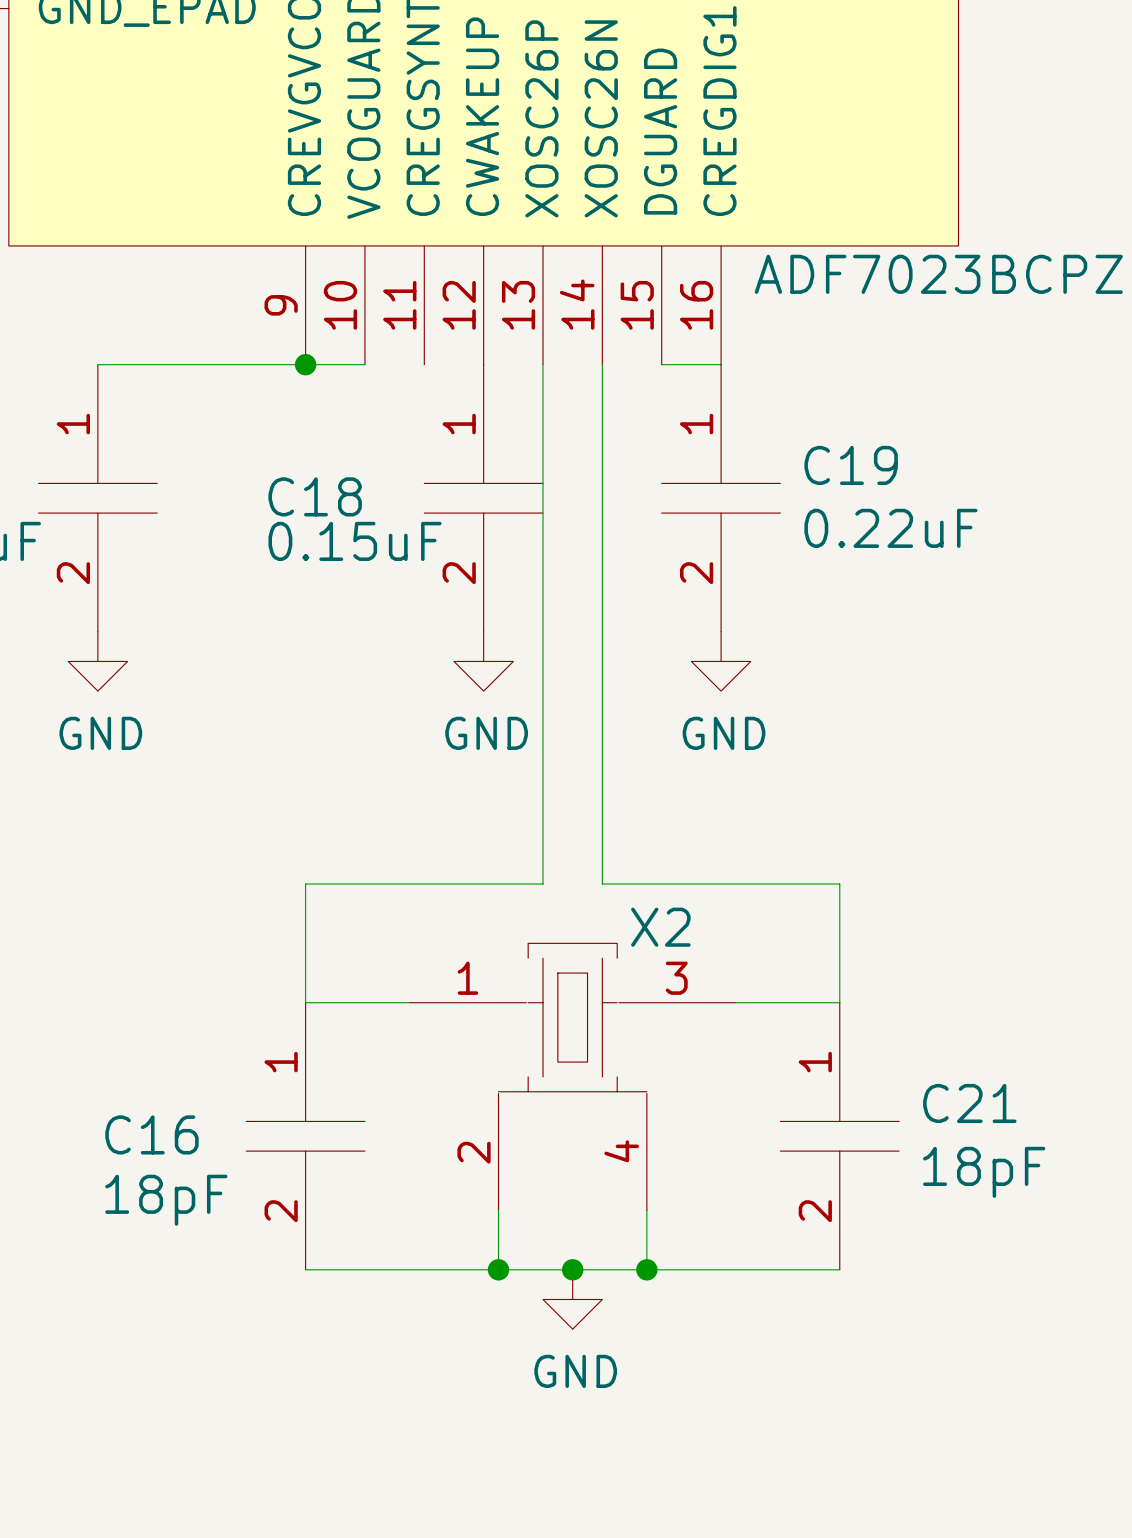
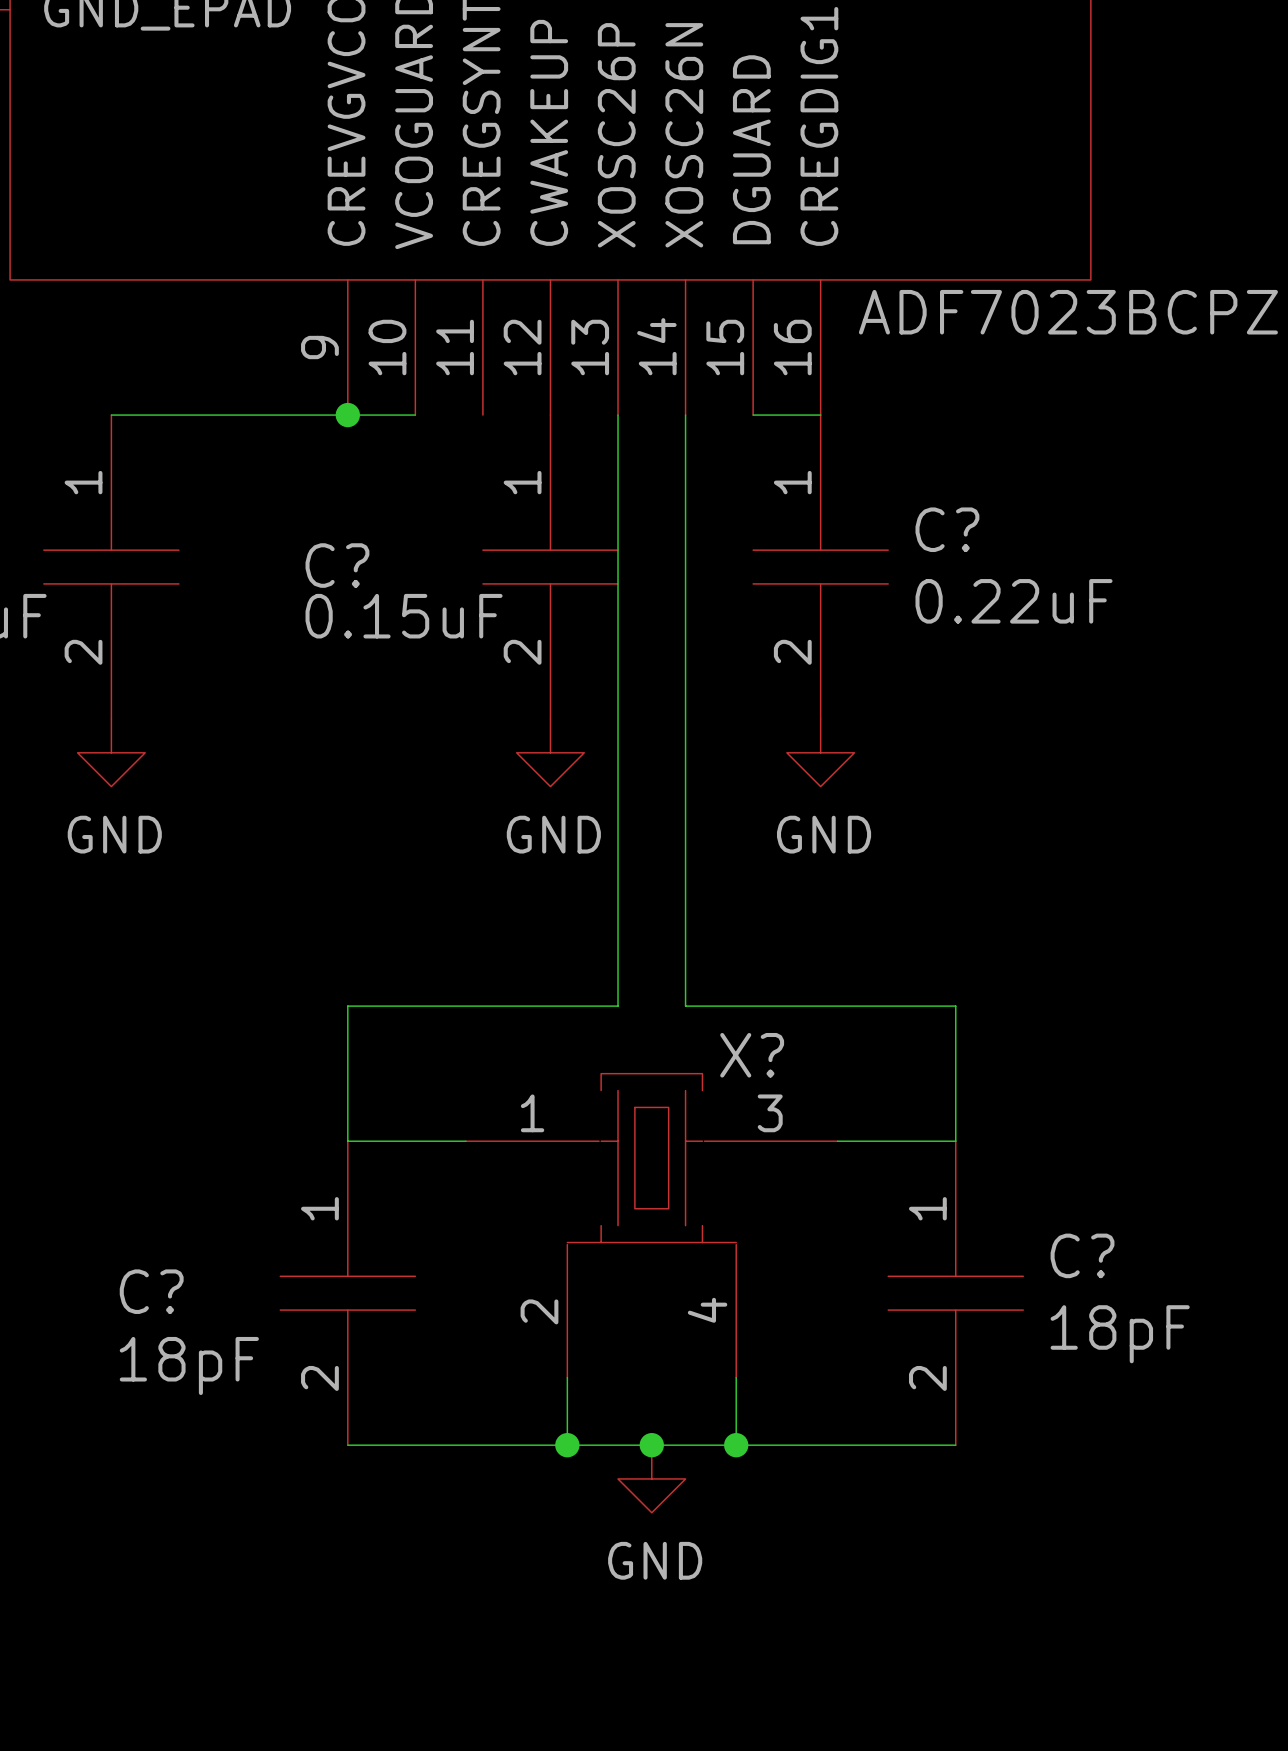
C19 name: C19 (851, 465) -> C? (947, 529)
C18 name: C18 (315, 496) -> C? (337, 565)
X2 name: X2 (660, 927) -> X? (752, 1055)
C21 name: C21 (969, 1103) -> C? (1082, 1255)
C16 name: C16 (151, 1134) -> C? (151, 1291)

